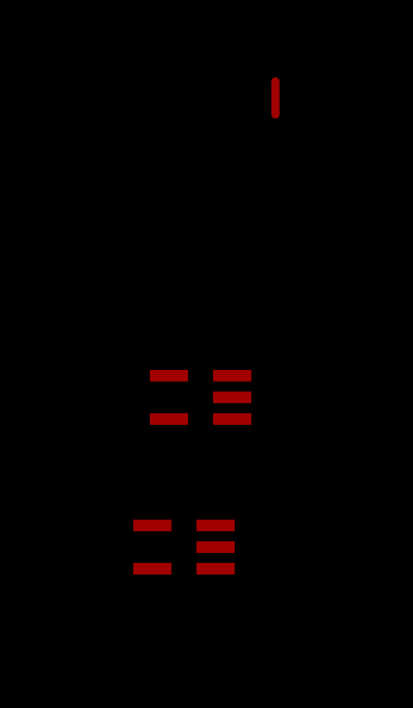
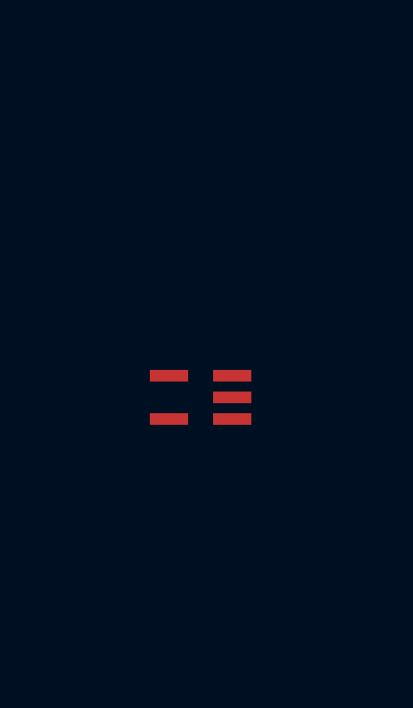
top track: (275, 81) (275, 114) -> none
part: (183, 547) -> none

